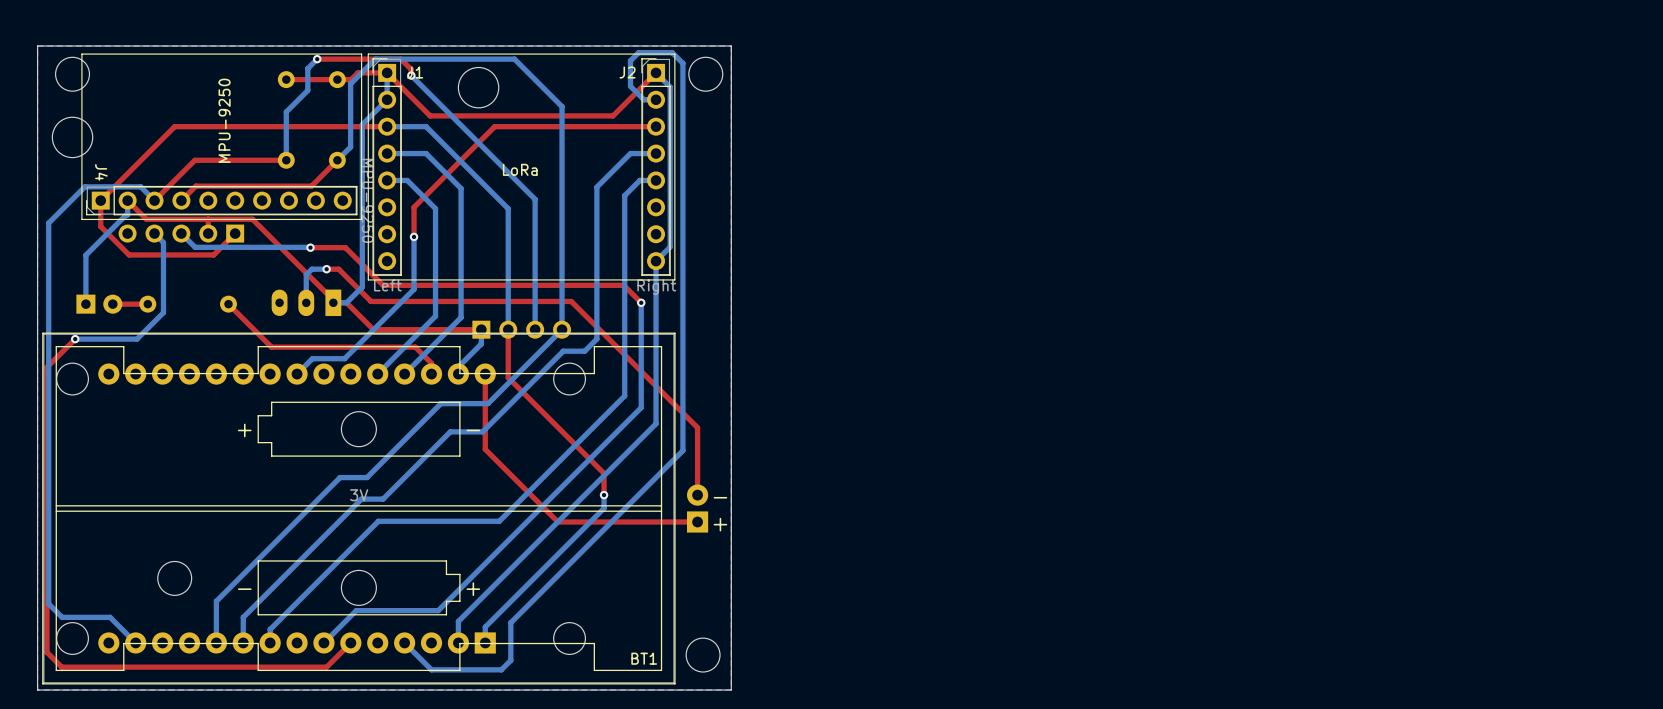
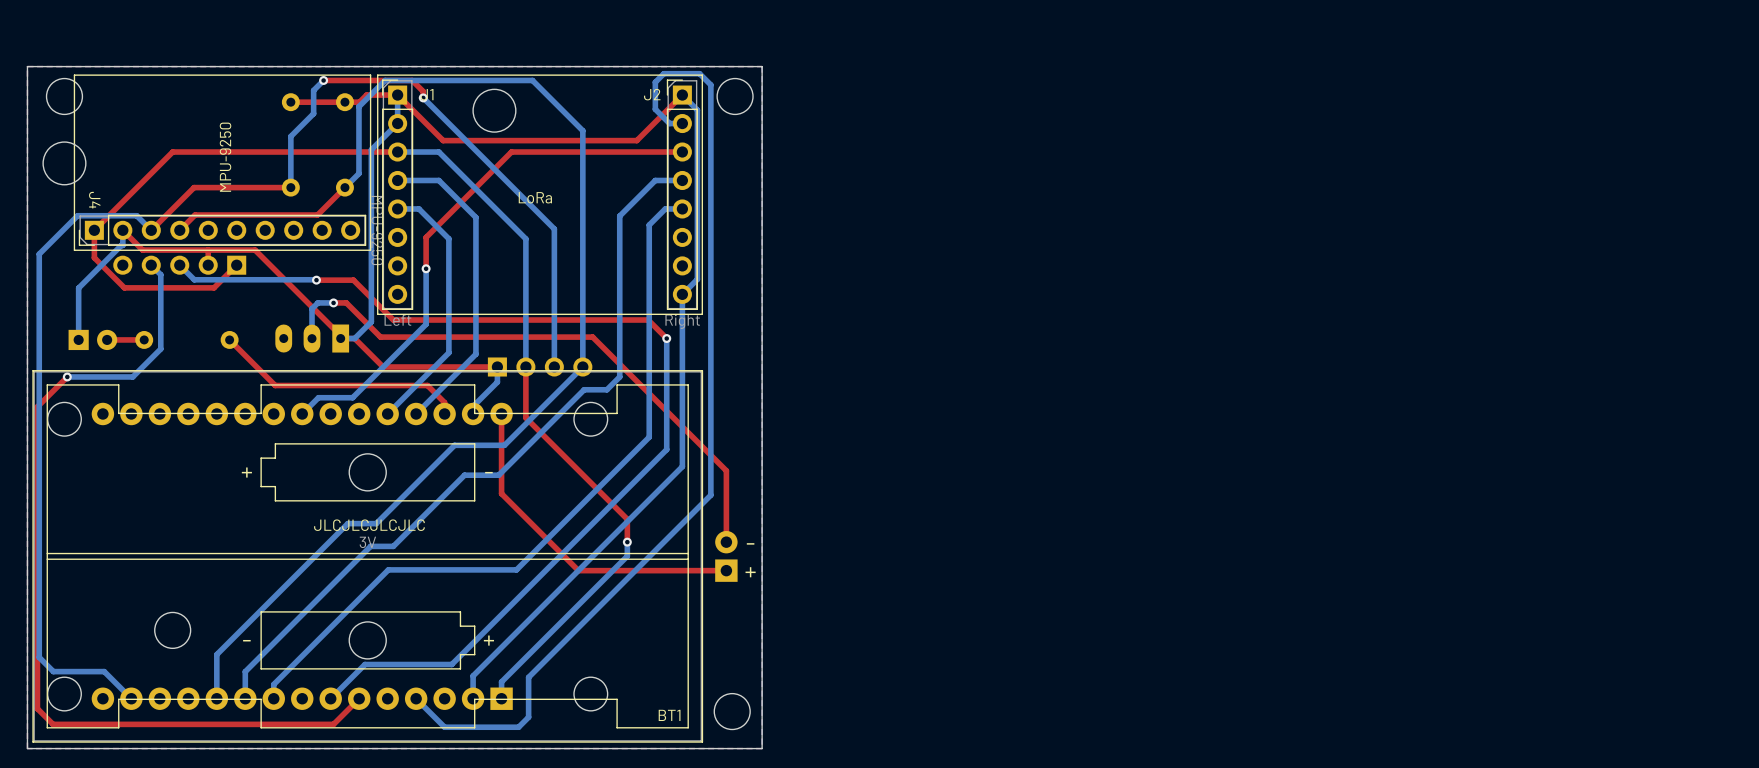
text: none -> JLCJLCJLCJLC (369, 525)

